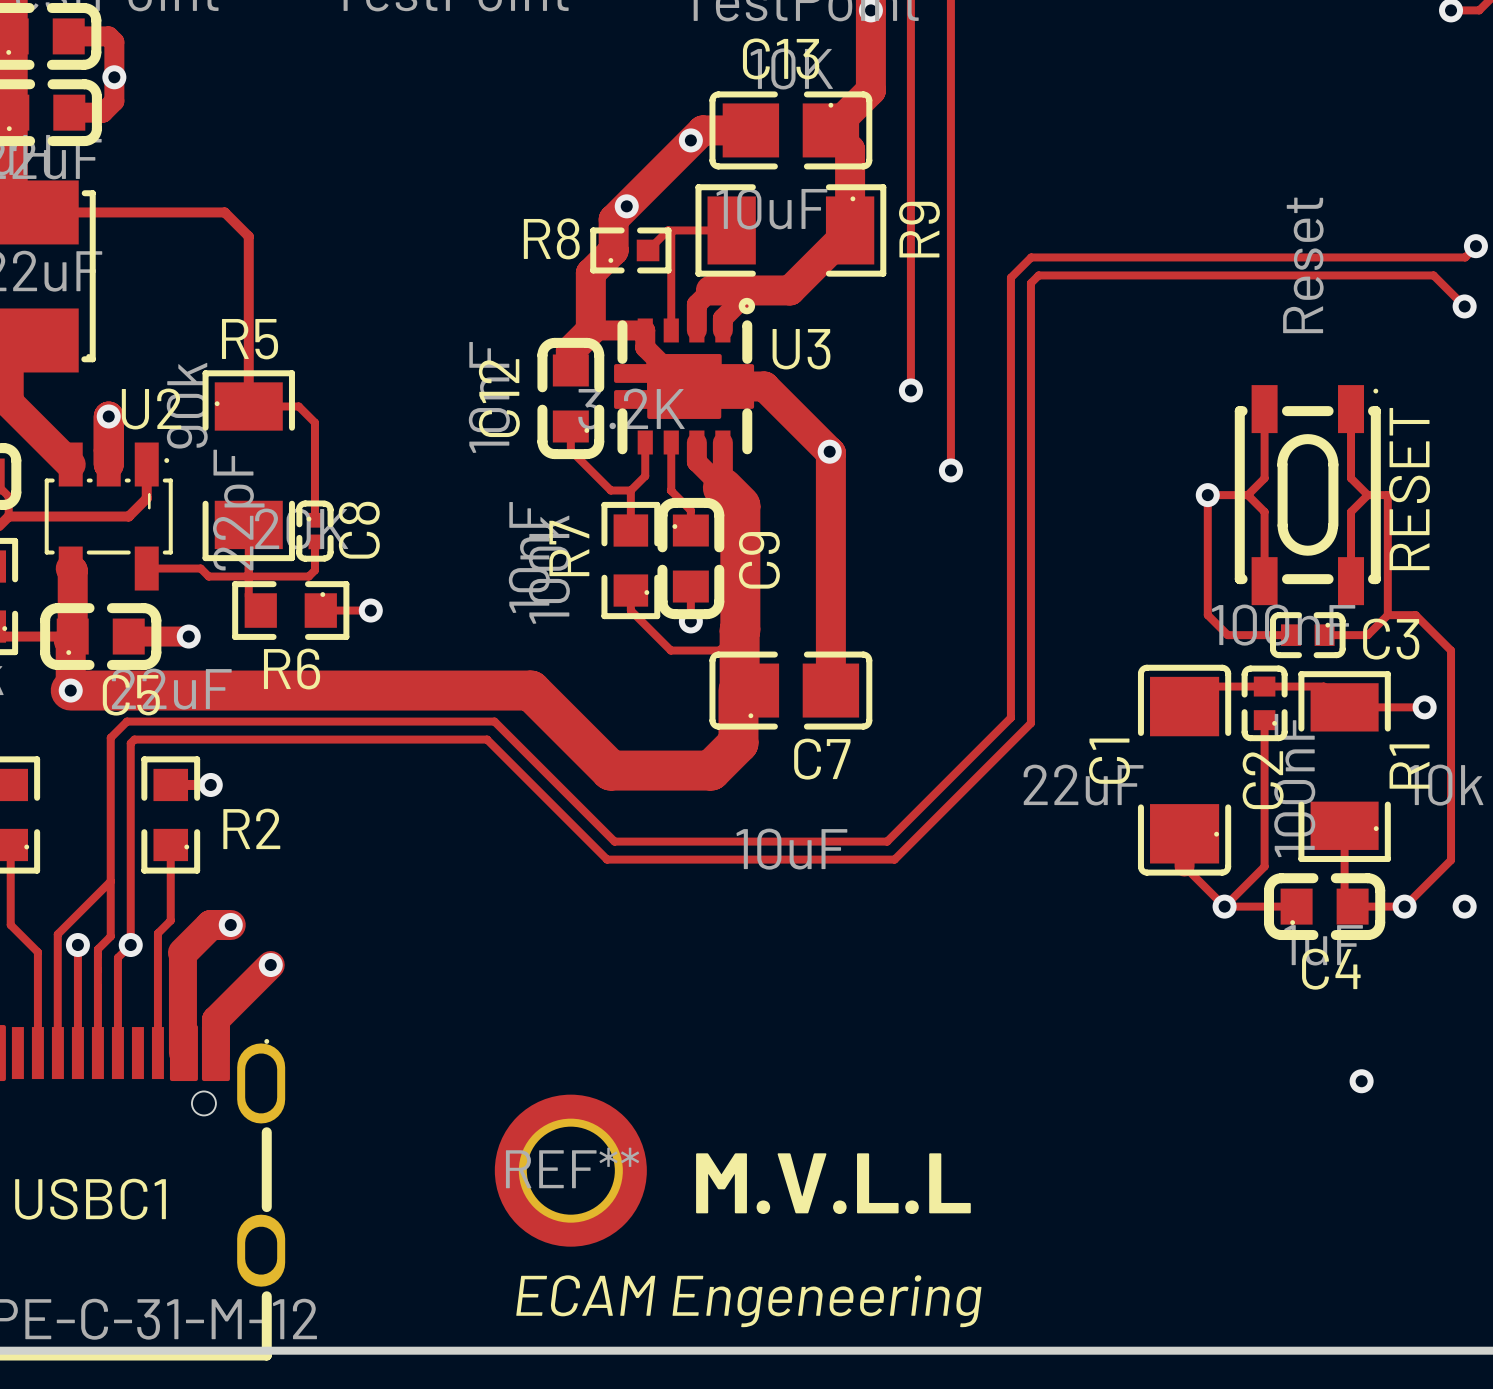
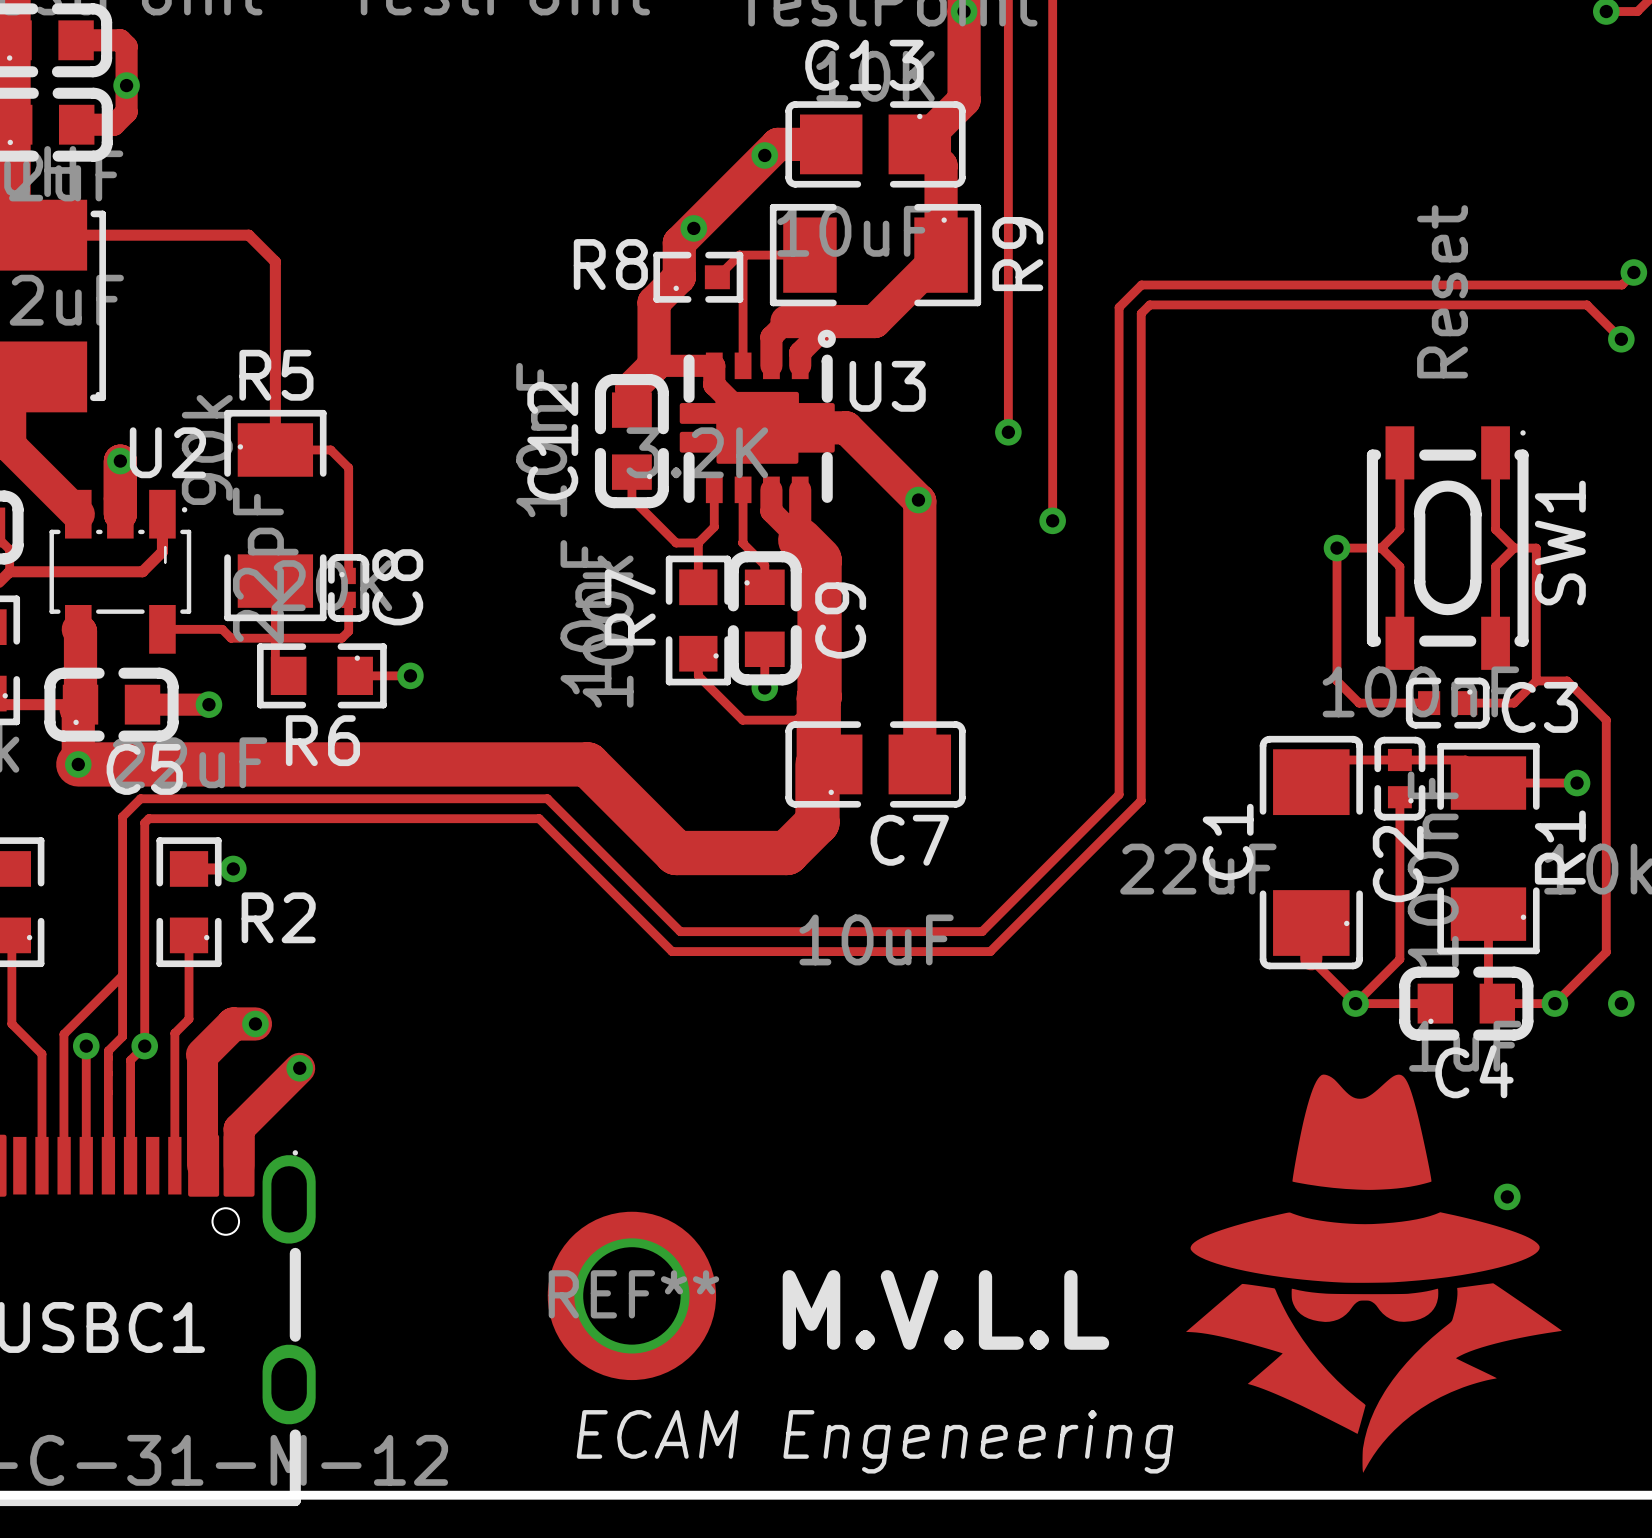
RESET name: RESET (1409, 489) -> SW1 (1560, 542)
drawing: none -> [1185, 1074, 1562, 1473]

